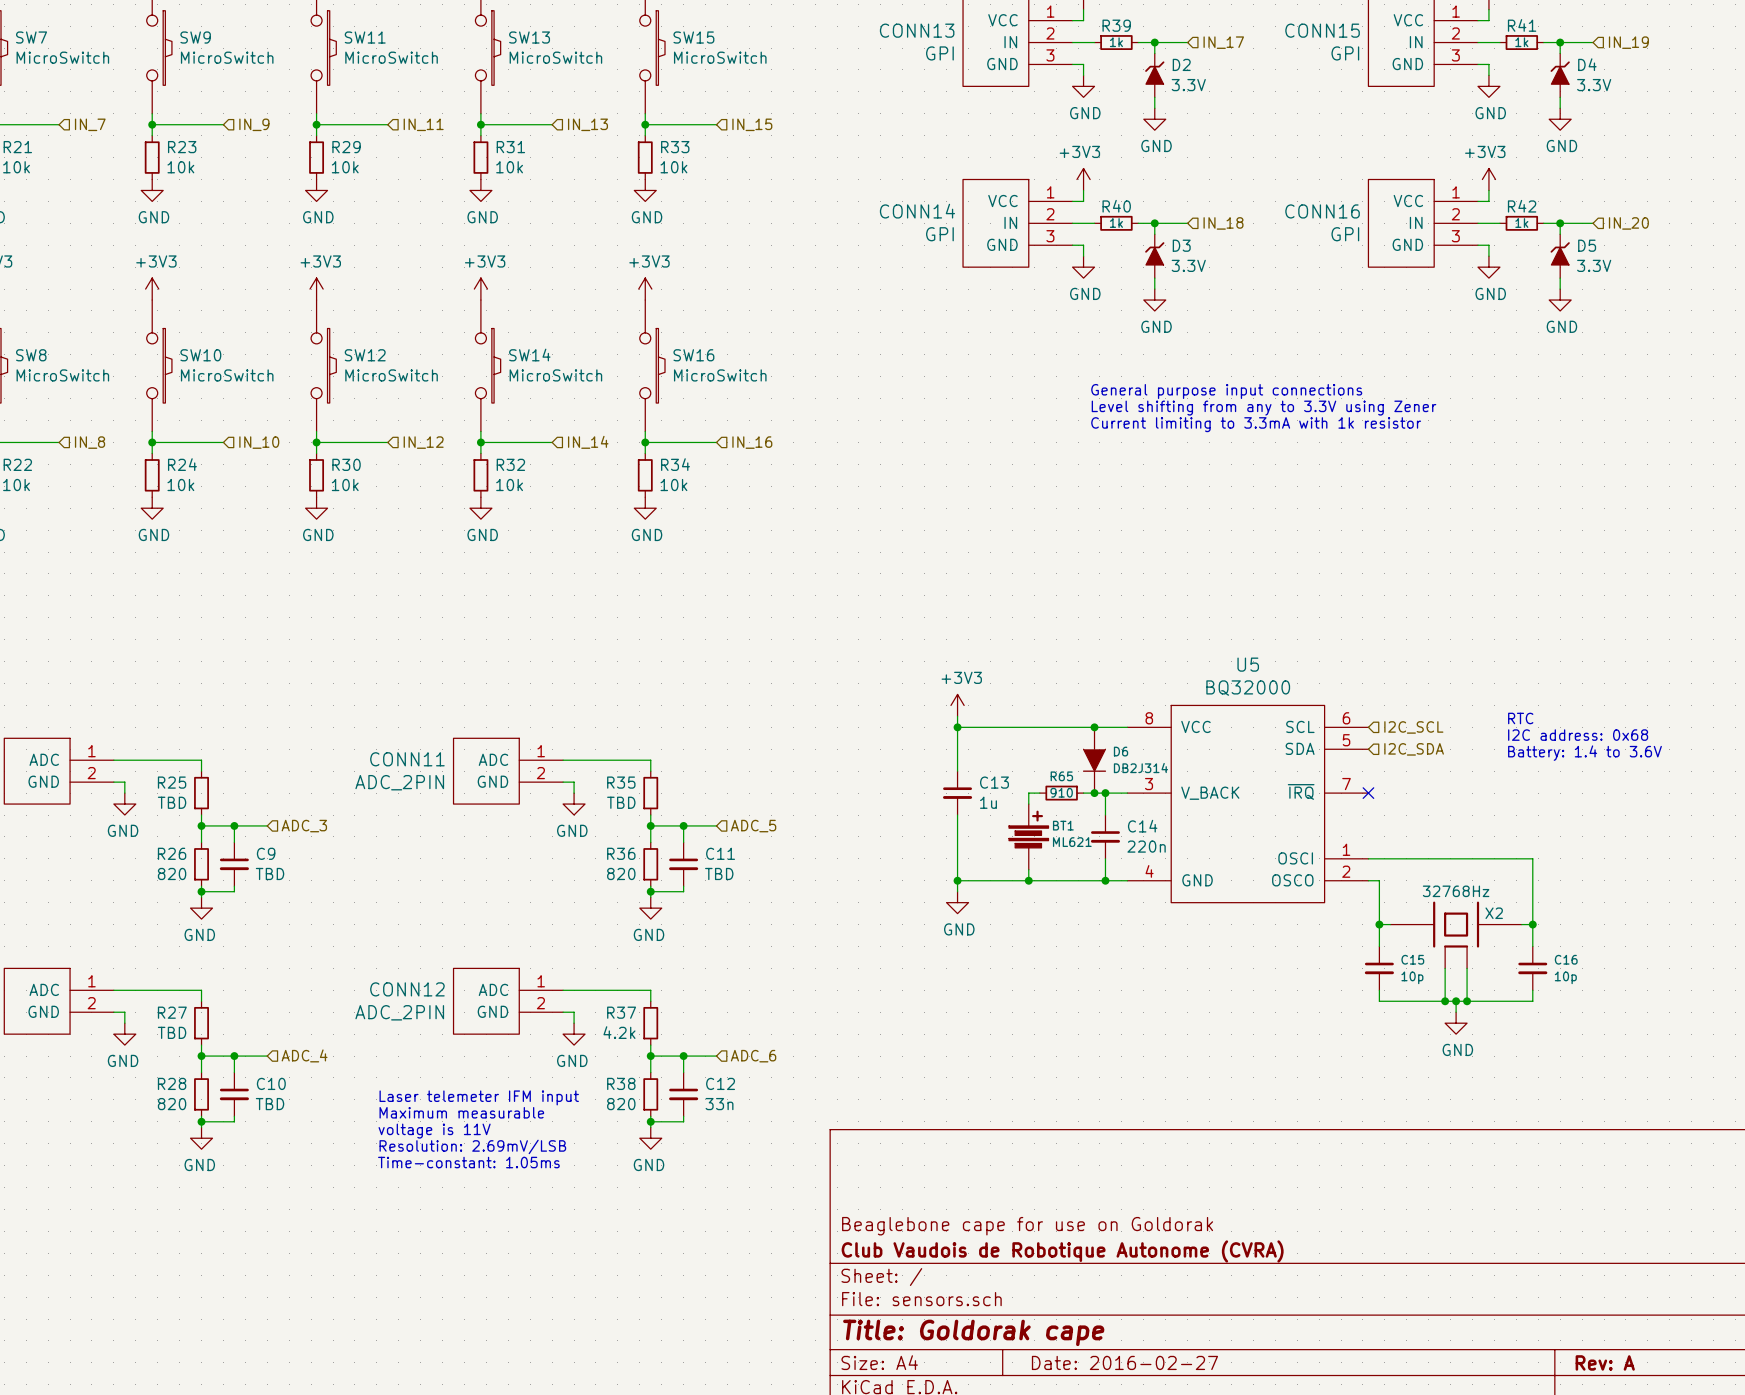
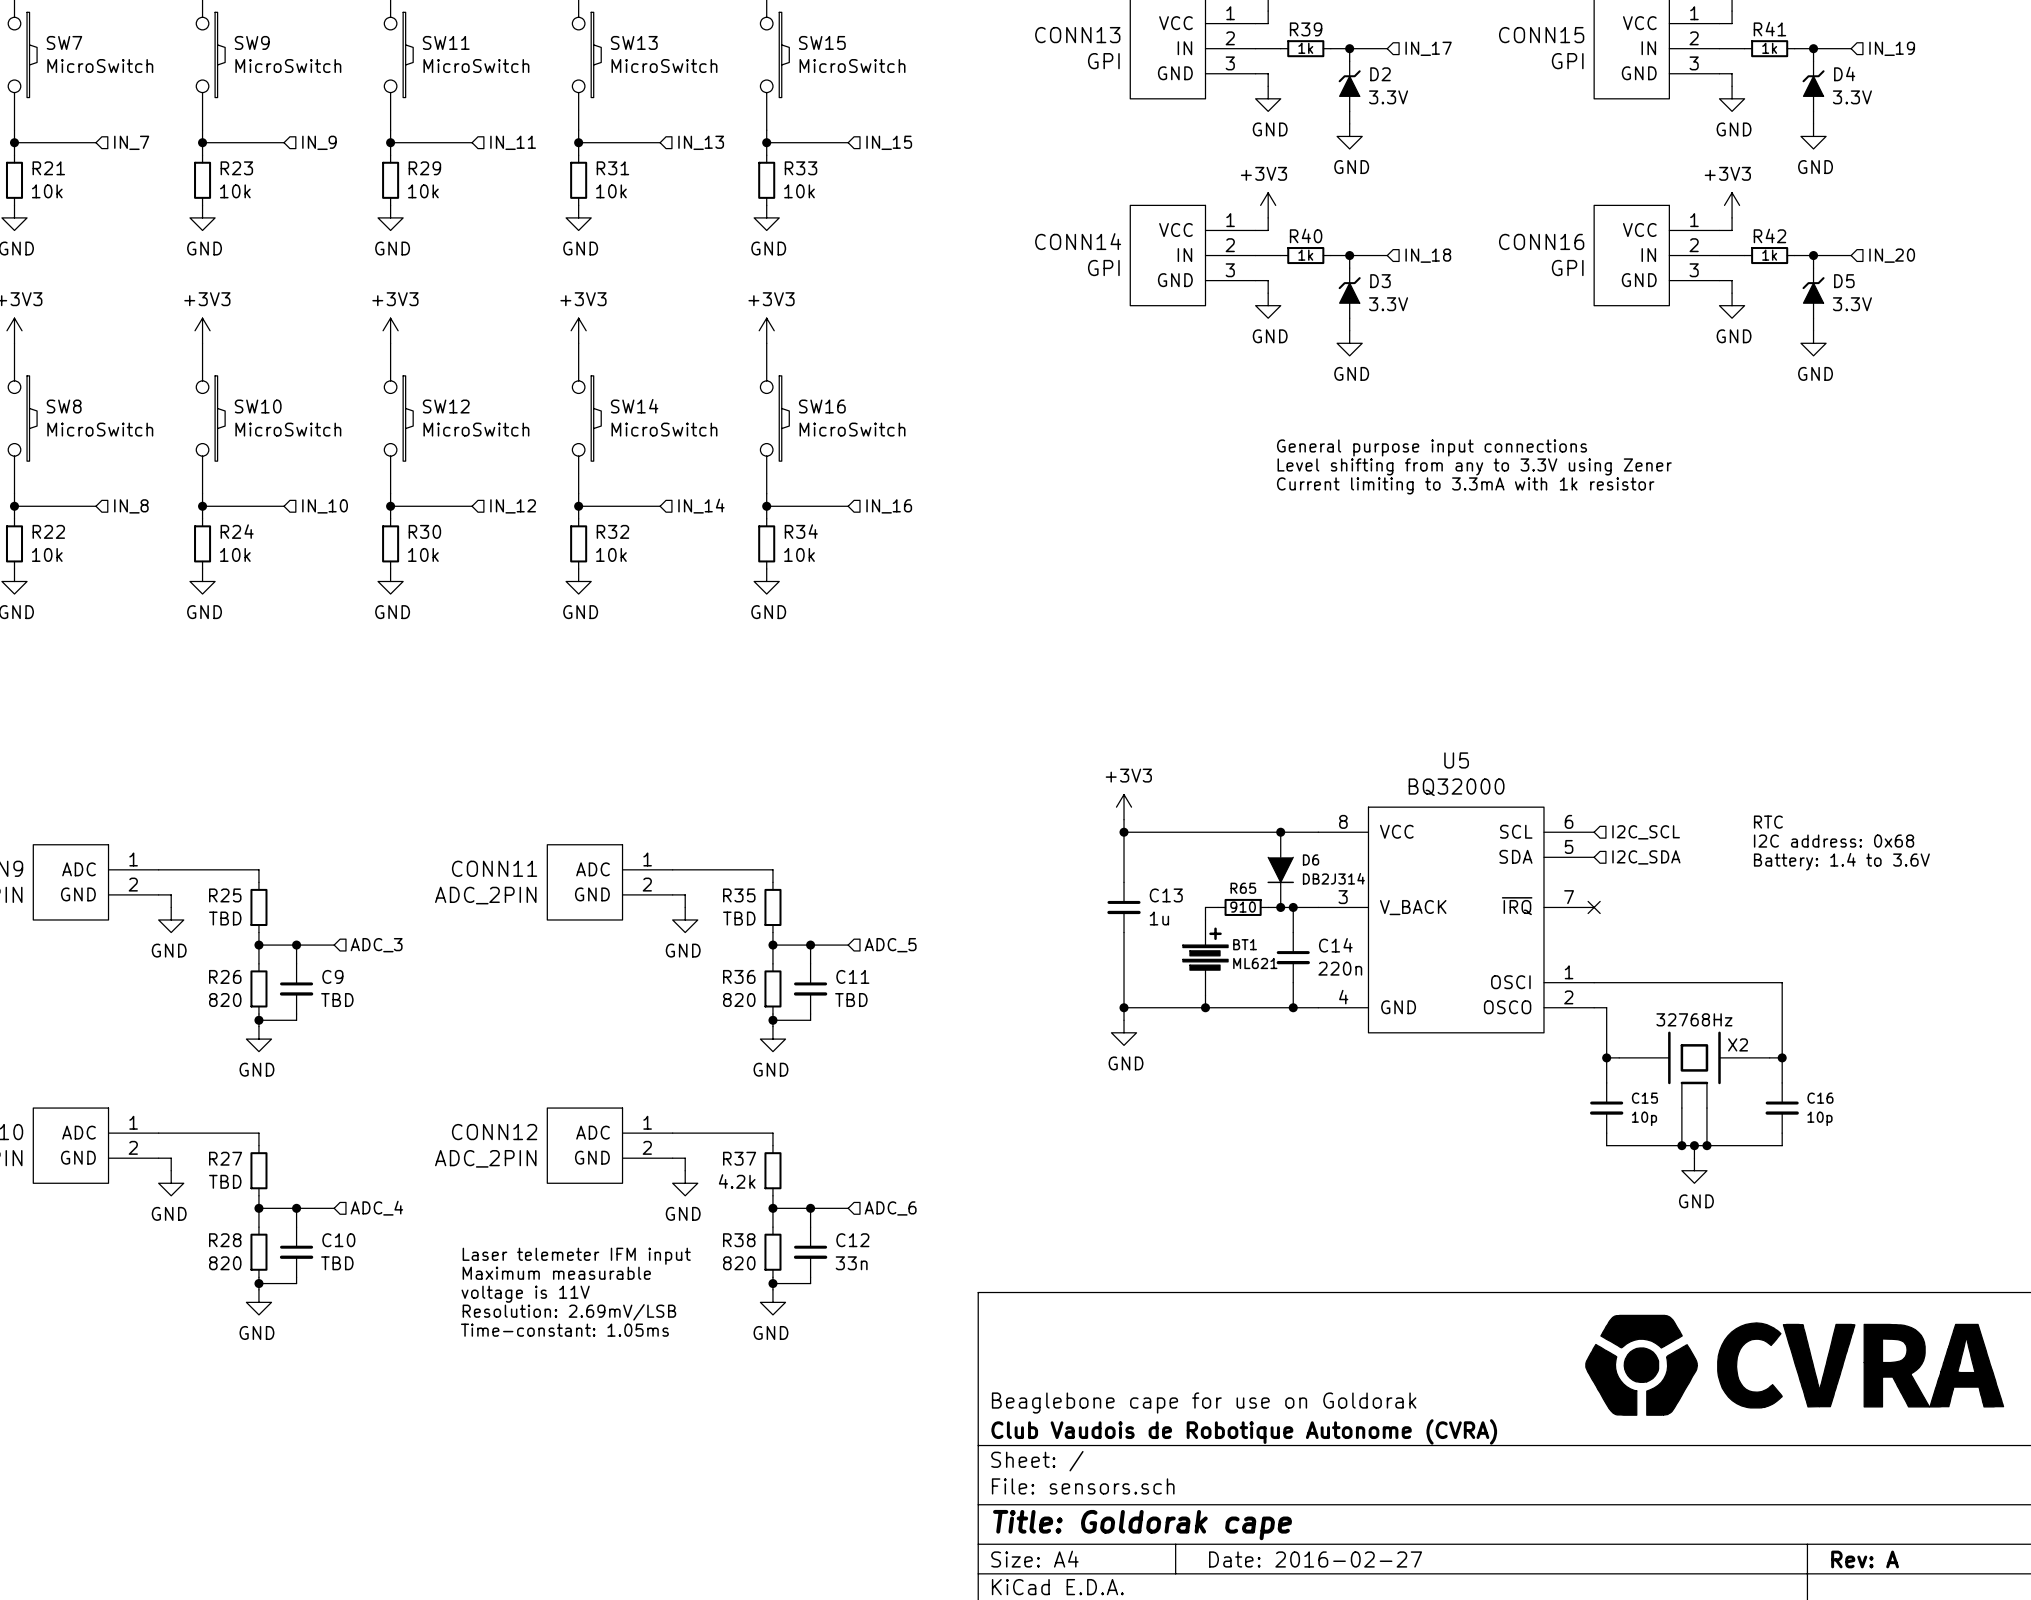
power symbol: none -> (1794, 1365)

